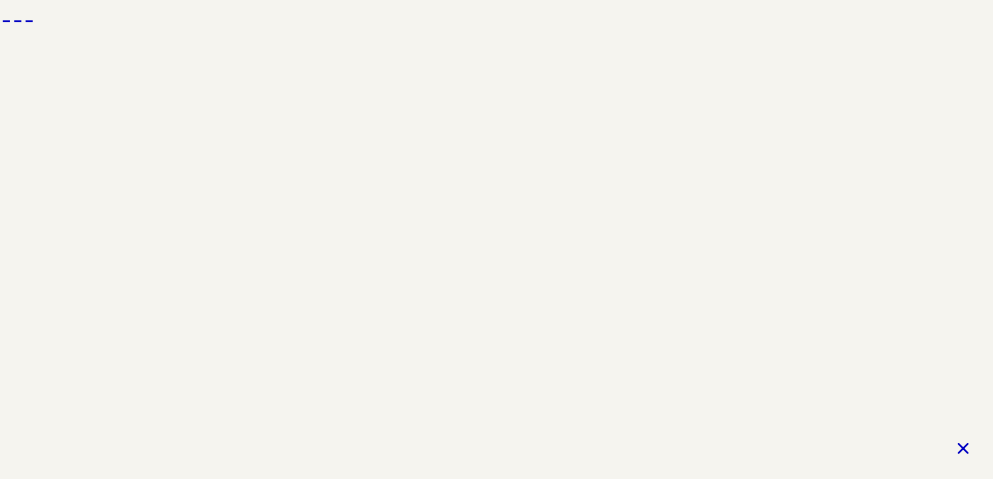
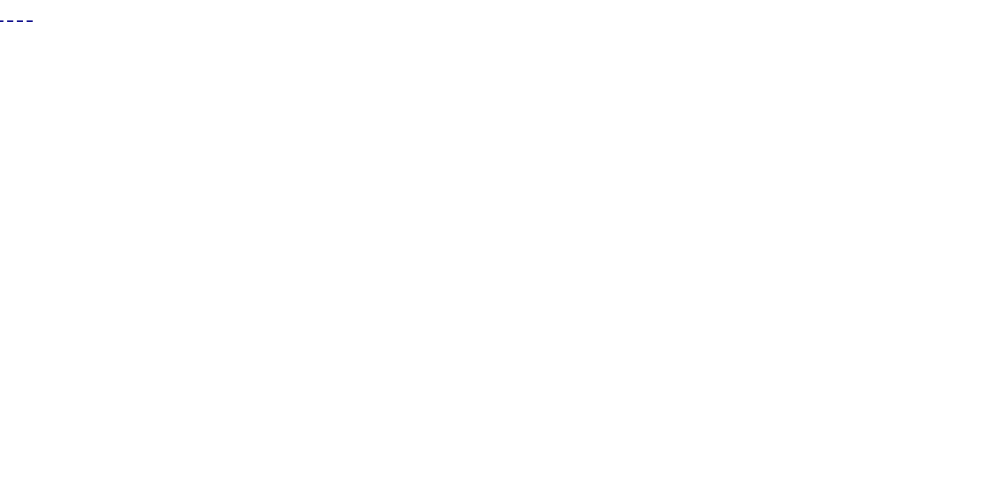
no-connect mark: (963, 448) -> none

